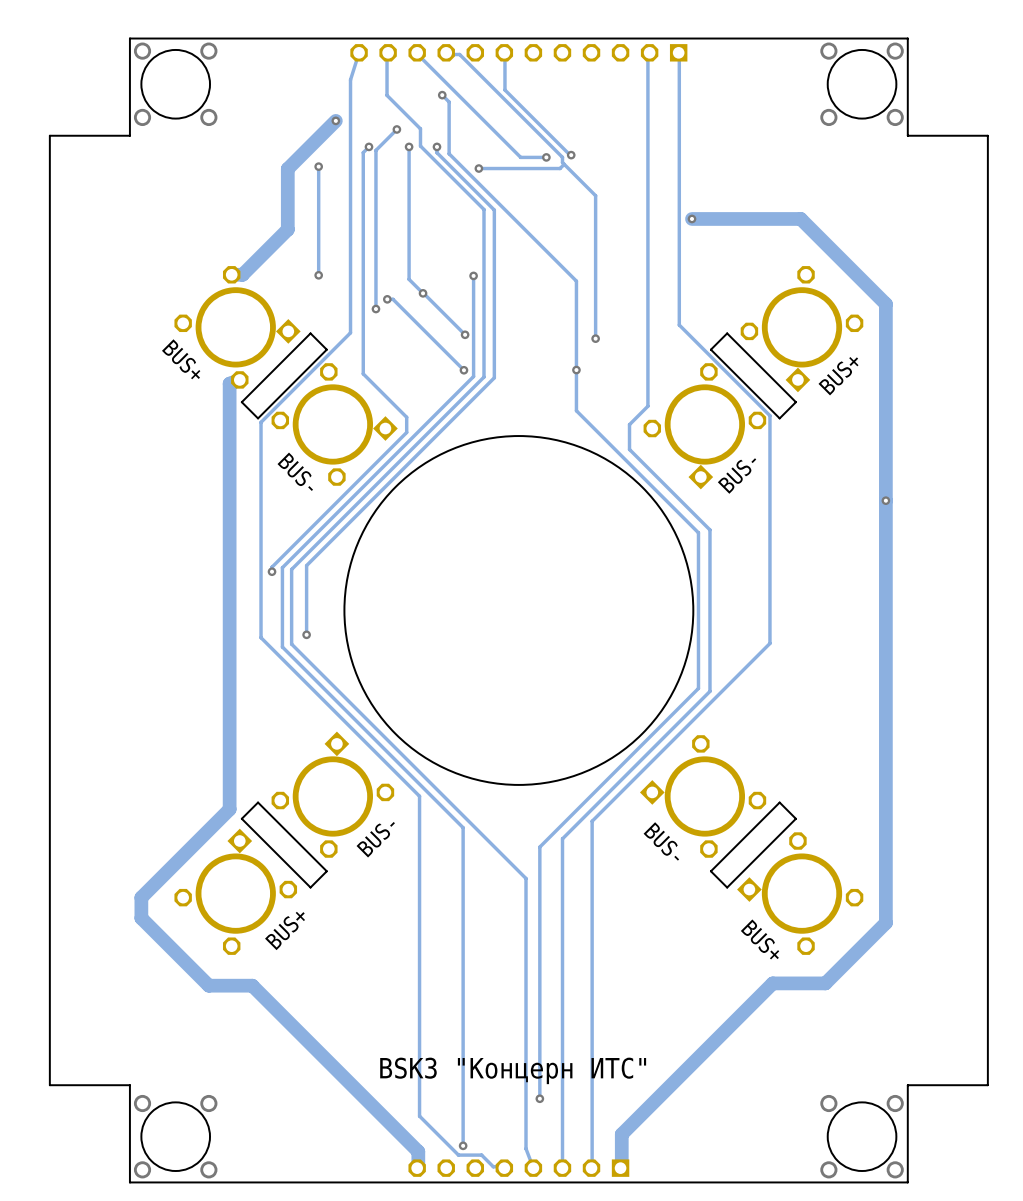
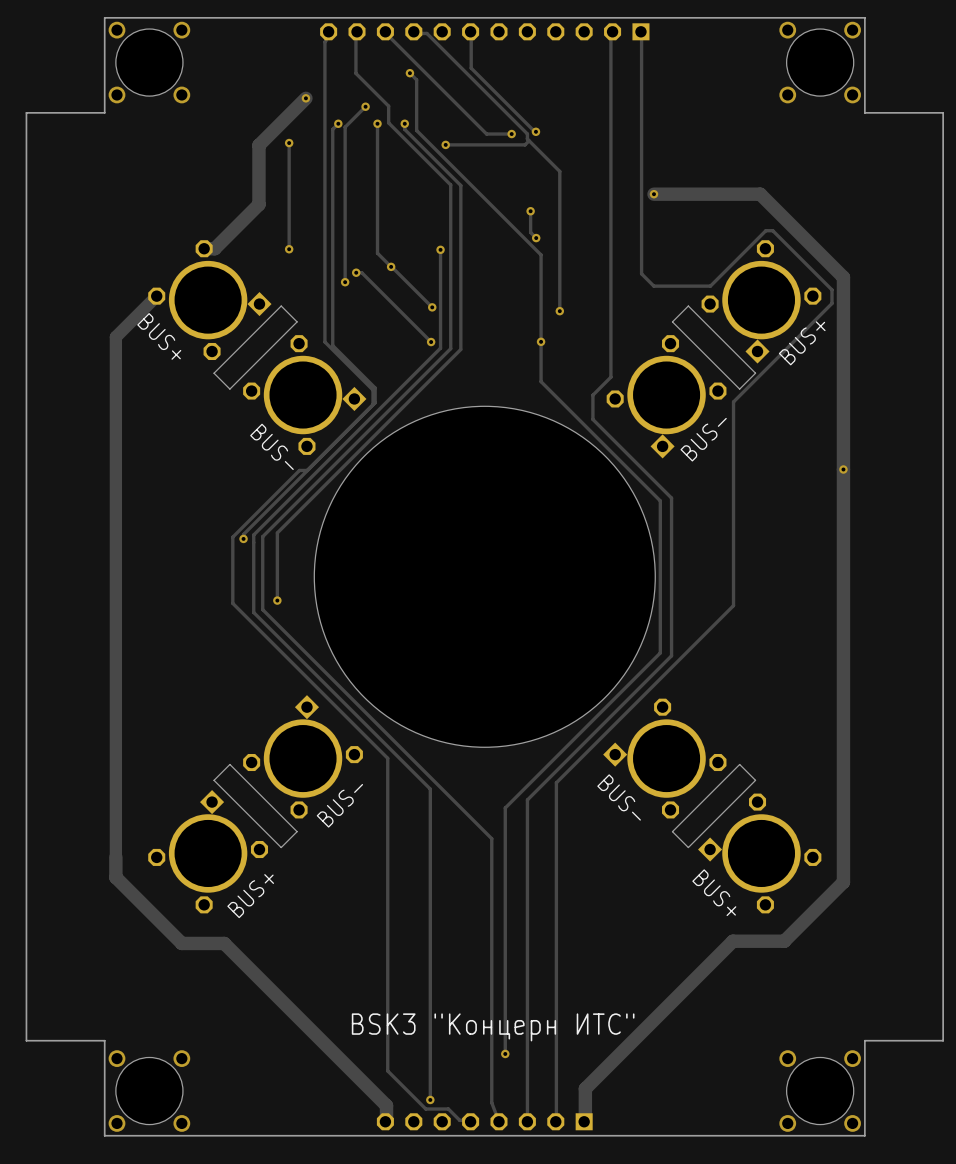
track: (356, 62) (350, 79) (350, 332) (261, 422) (261, 569) -> (325, 41) (324, 342) (373, 390) (373, 404) (307, 470) (299, 470) (232, 537)
track: none -> (530, 211) (530, 232) (536, 238)
via: none -> (530, 211)
via: none -> (536, 238)
track: (679, 300) (679, 325) (769, 415) (769, 643) -> (641, 273) (653, 286) (710, 286) (765, 230) (772, 230) (831, 289) (831, 303) (733, 401) (733, 605) (730, 609)
track: (239, 379) (229, 383) (229, 809) (141, 897) -> (156, 296) (115, 337) (115, 857)

